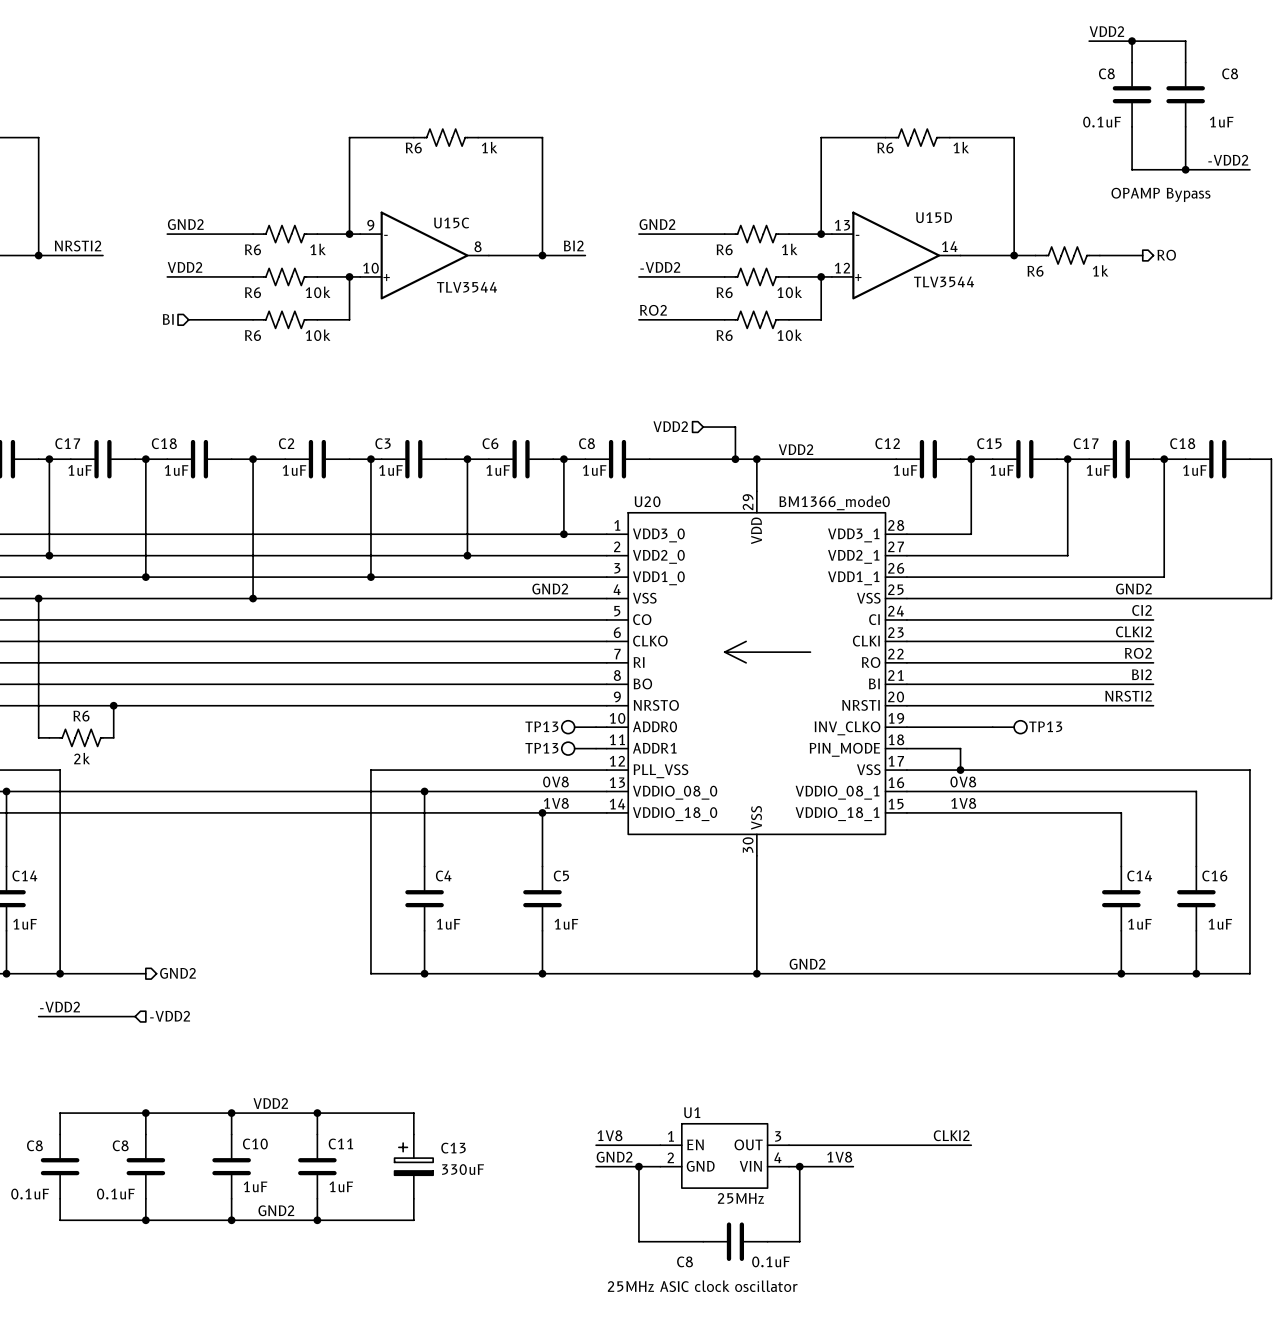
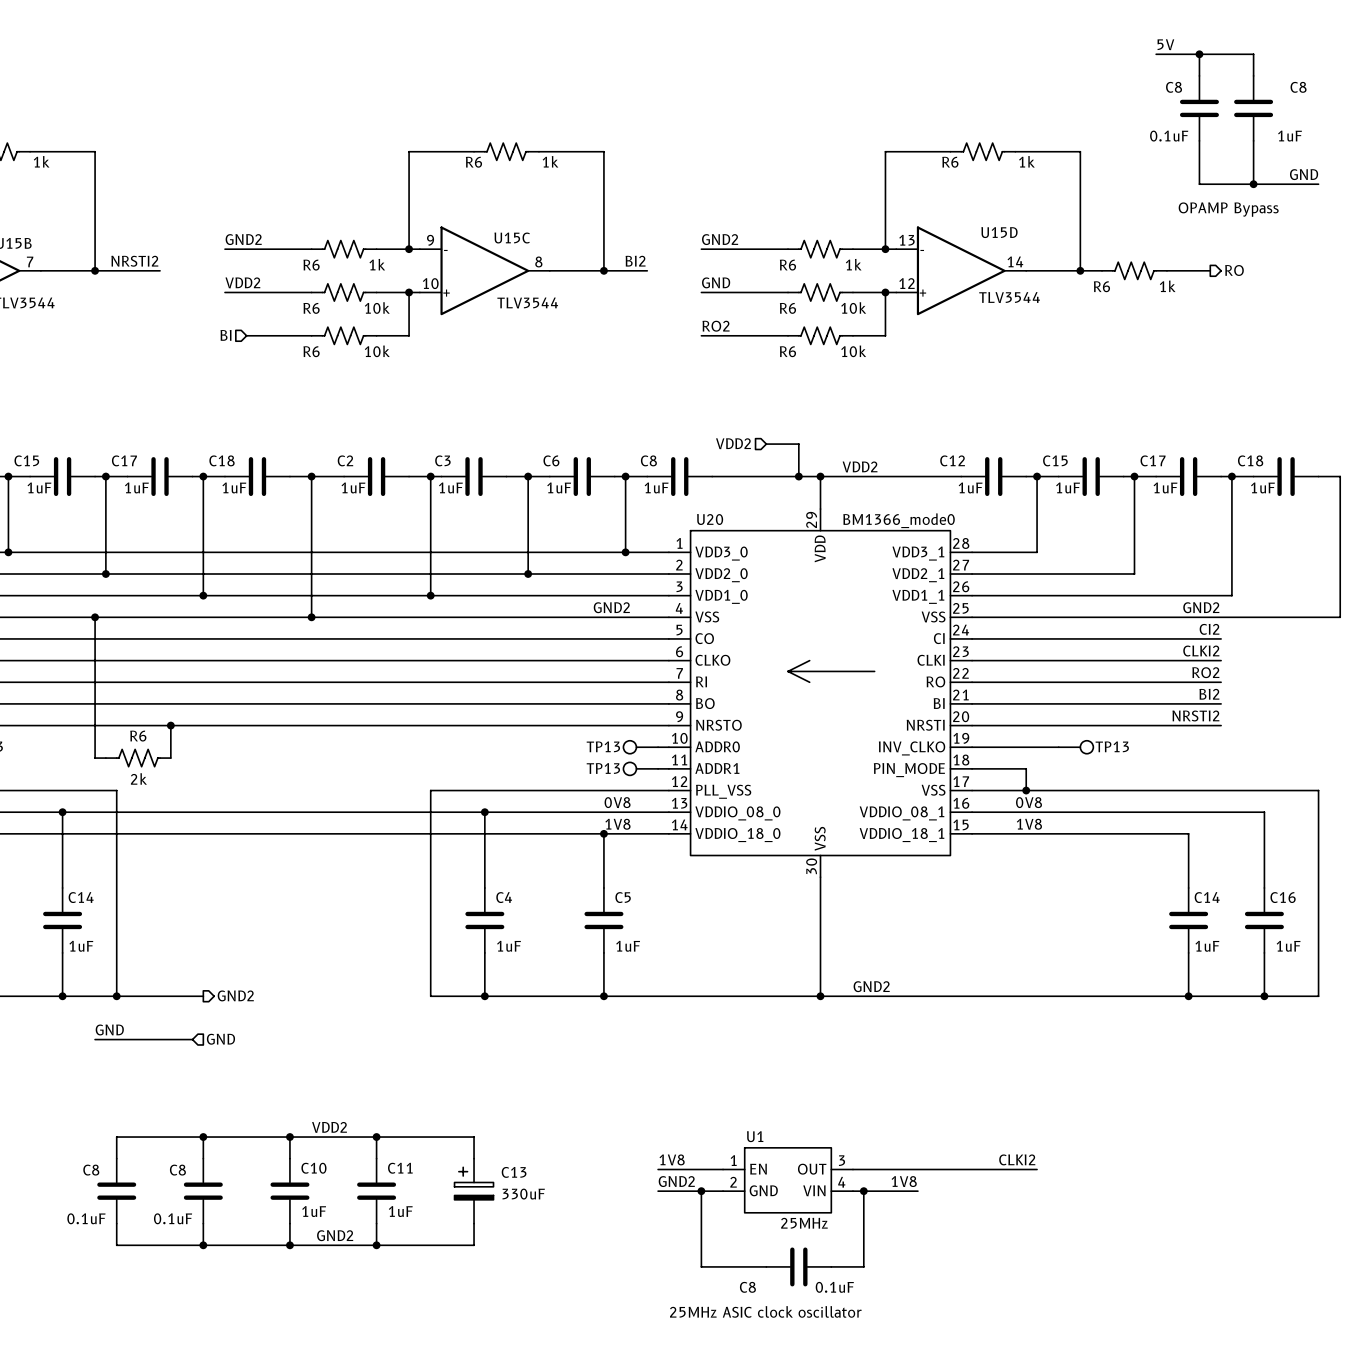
label: VDD2 (1106, 31) -> 5V (1165, 44)
label: -VDD2 (1228, 160) -> GND (1304, 174)
label: -VDD2 (660, 267) -> GND (716, 282)
label: -VDD2 (60, 1007) -> GND (109, 1029)
hierarchical label: -VDD2 (170, 1016) -> GND (220, 1039)

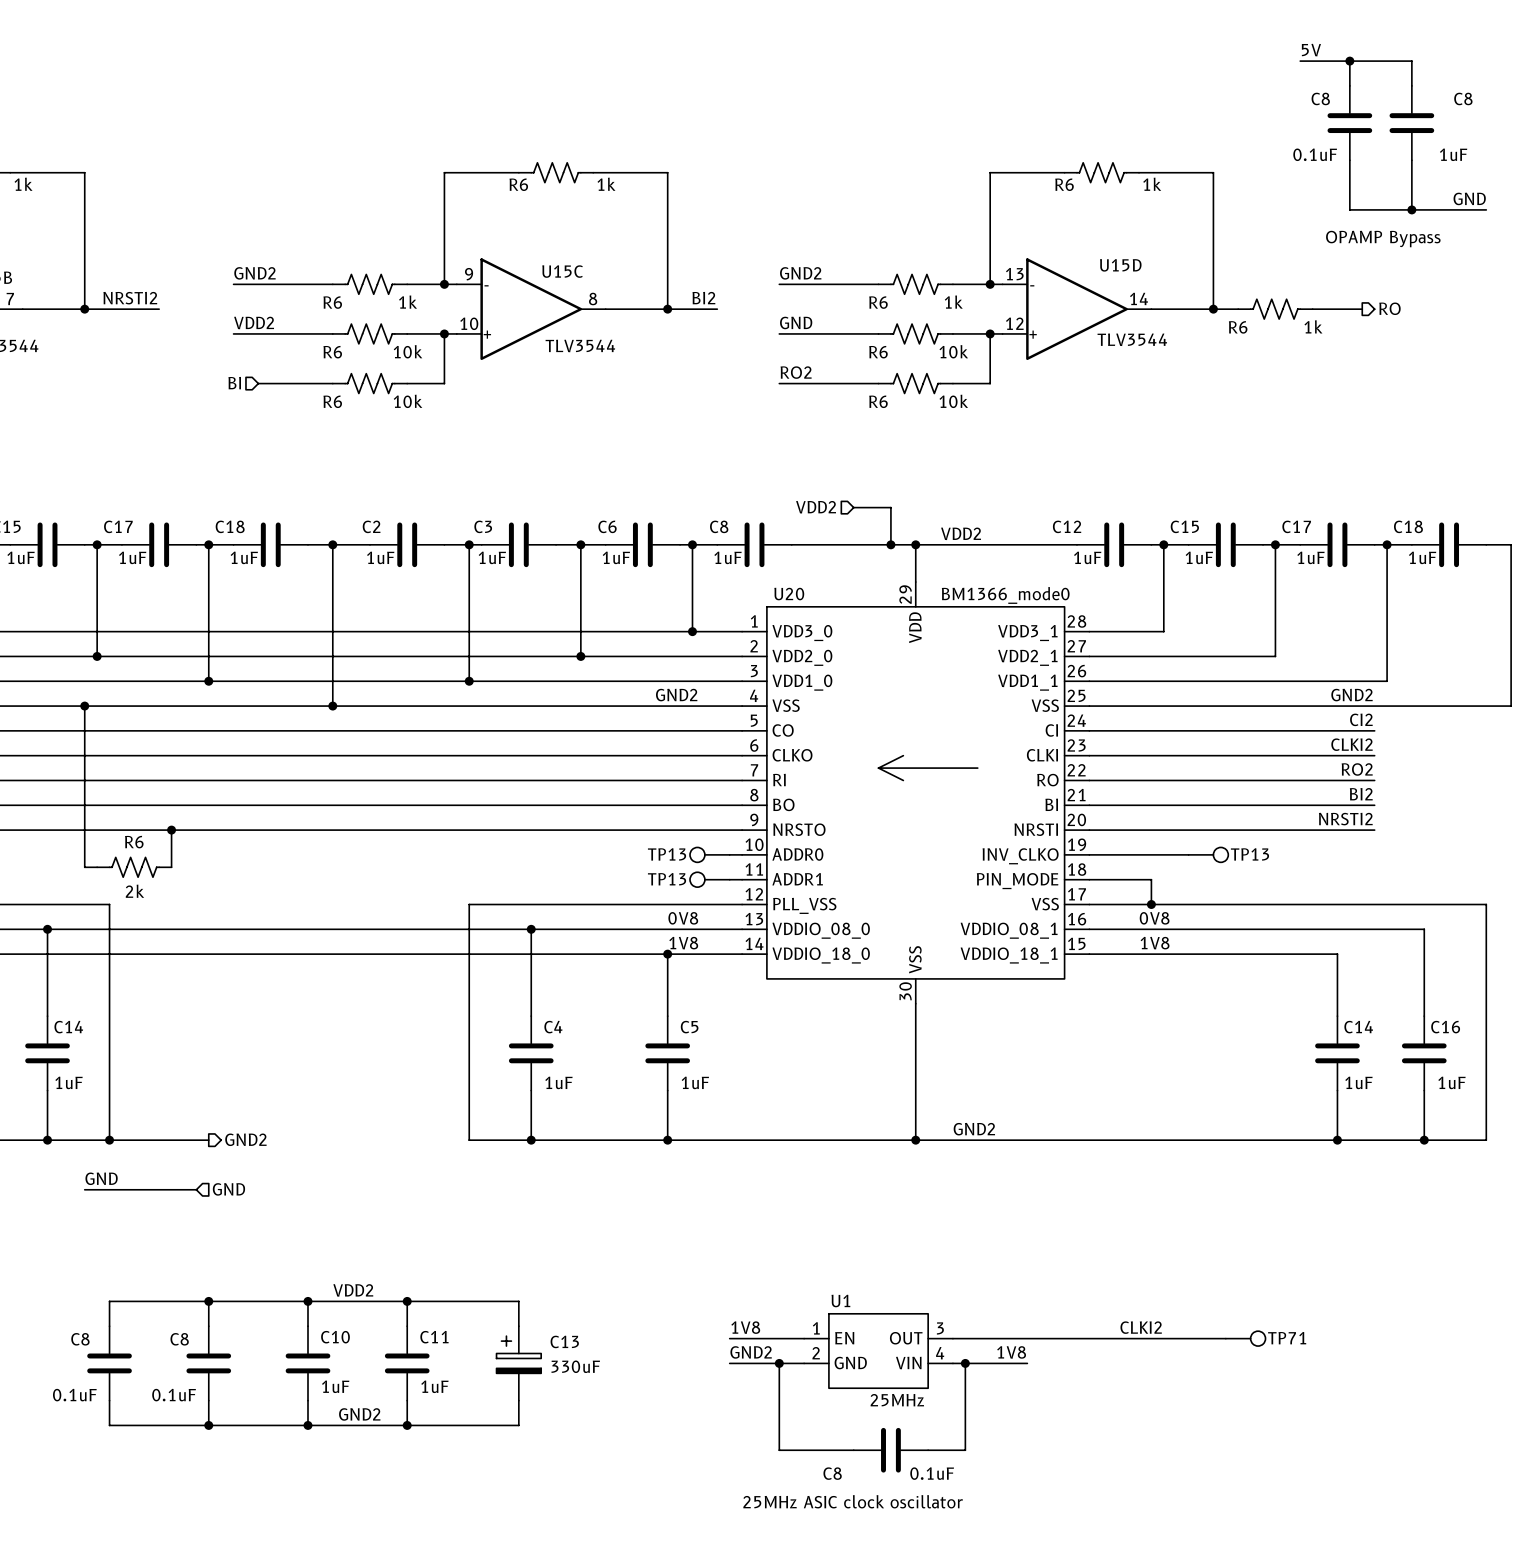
wire: none -> (1163, 1338) (1225, 1338)
TP71: none -> (1245, 1338)

